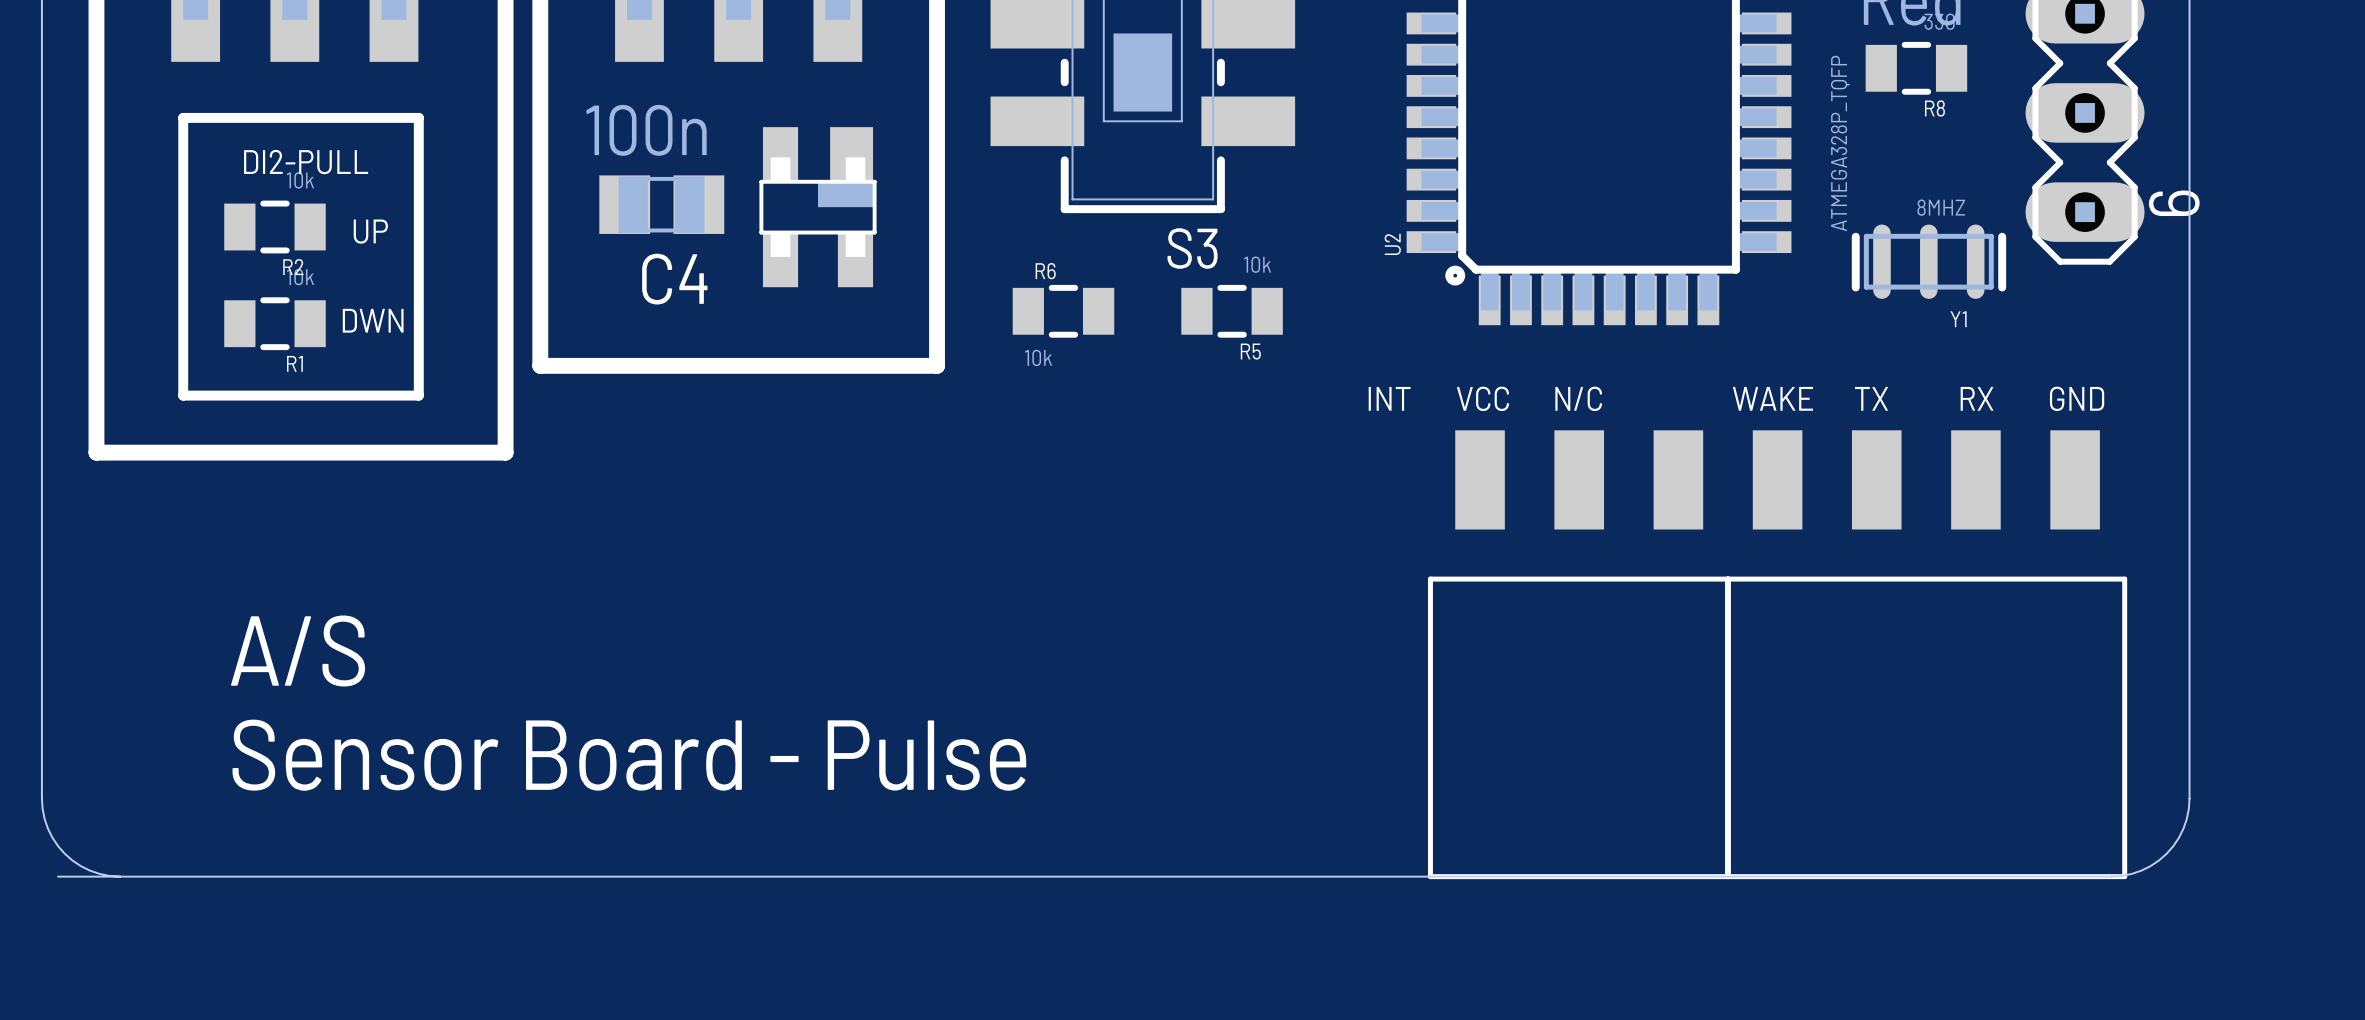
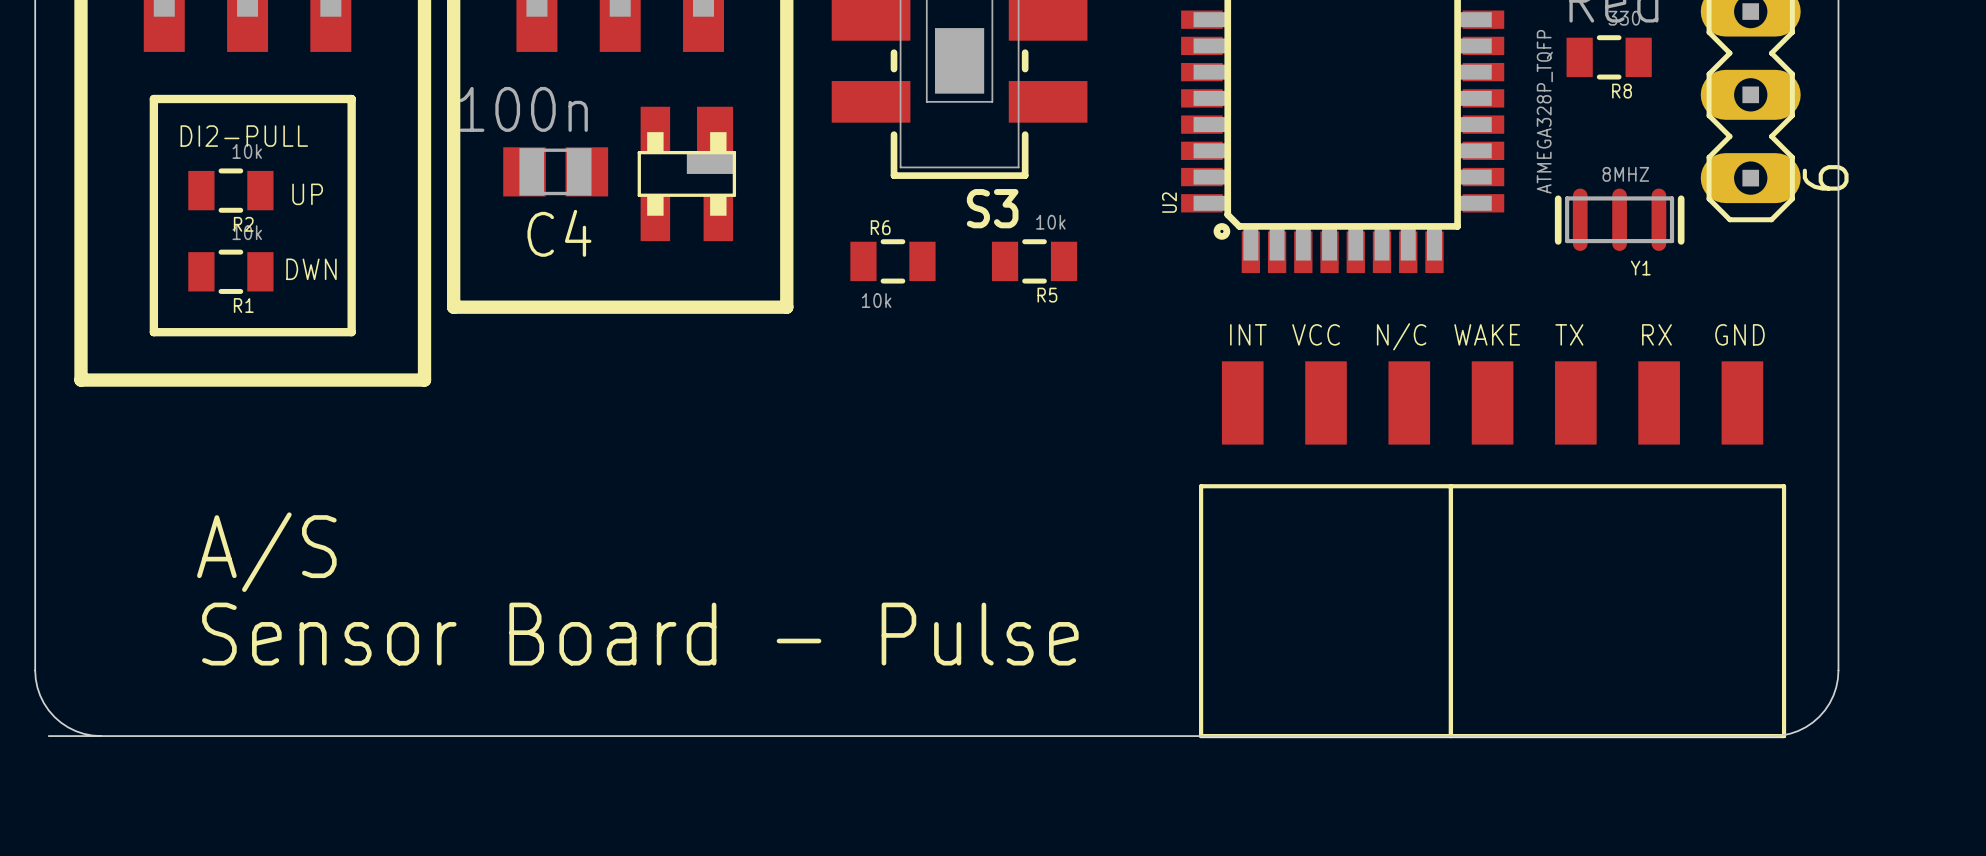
text: INT (1389, 398) -> none
text: VCC (1482, 398) -> INT (1248, 334)
text: N/C (1578, 398) -> VCC (1316, 334)
text: none -> N/C (1401, 336)

